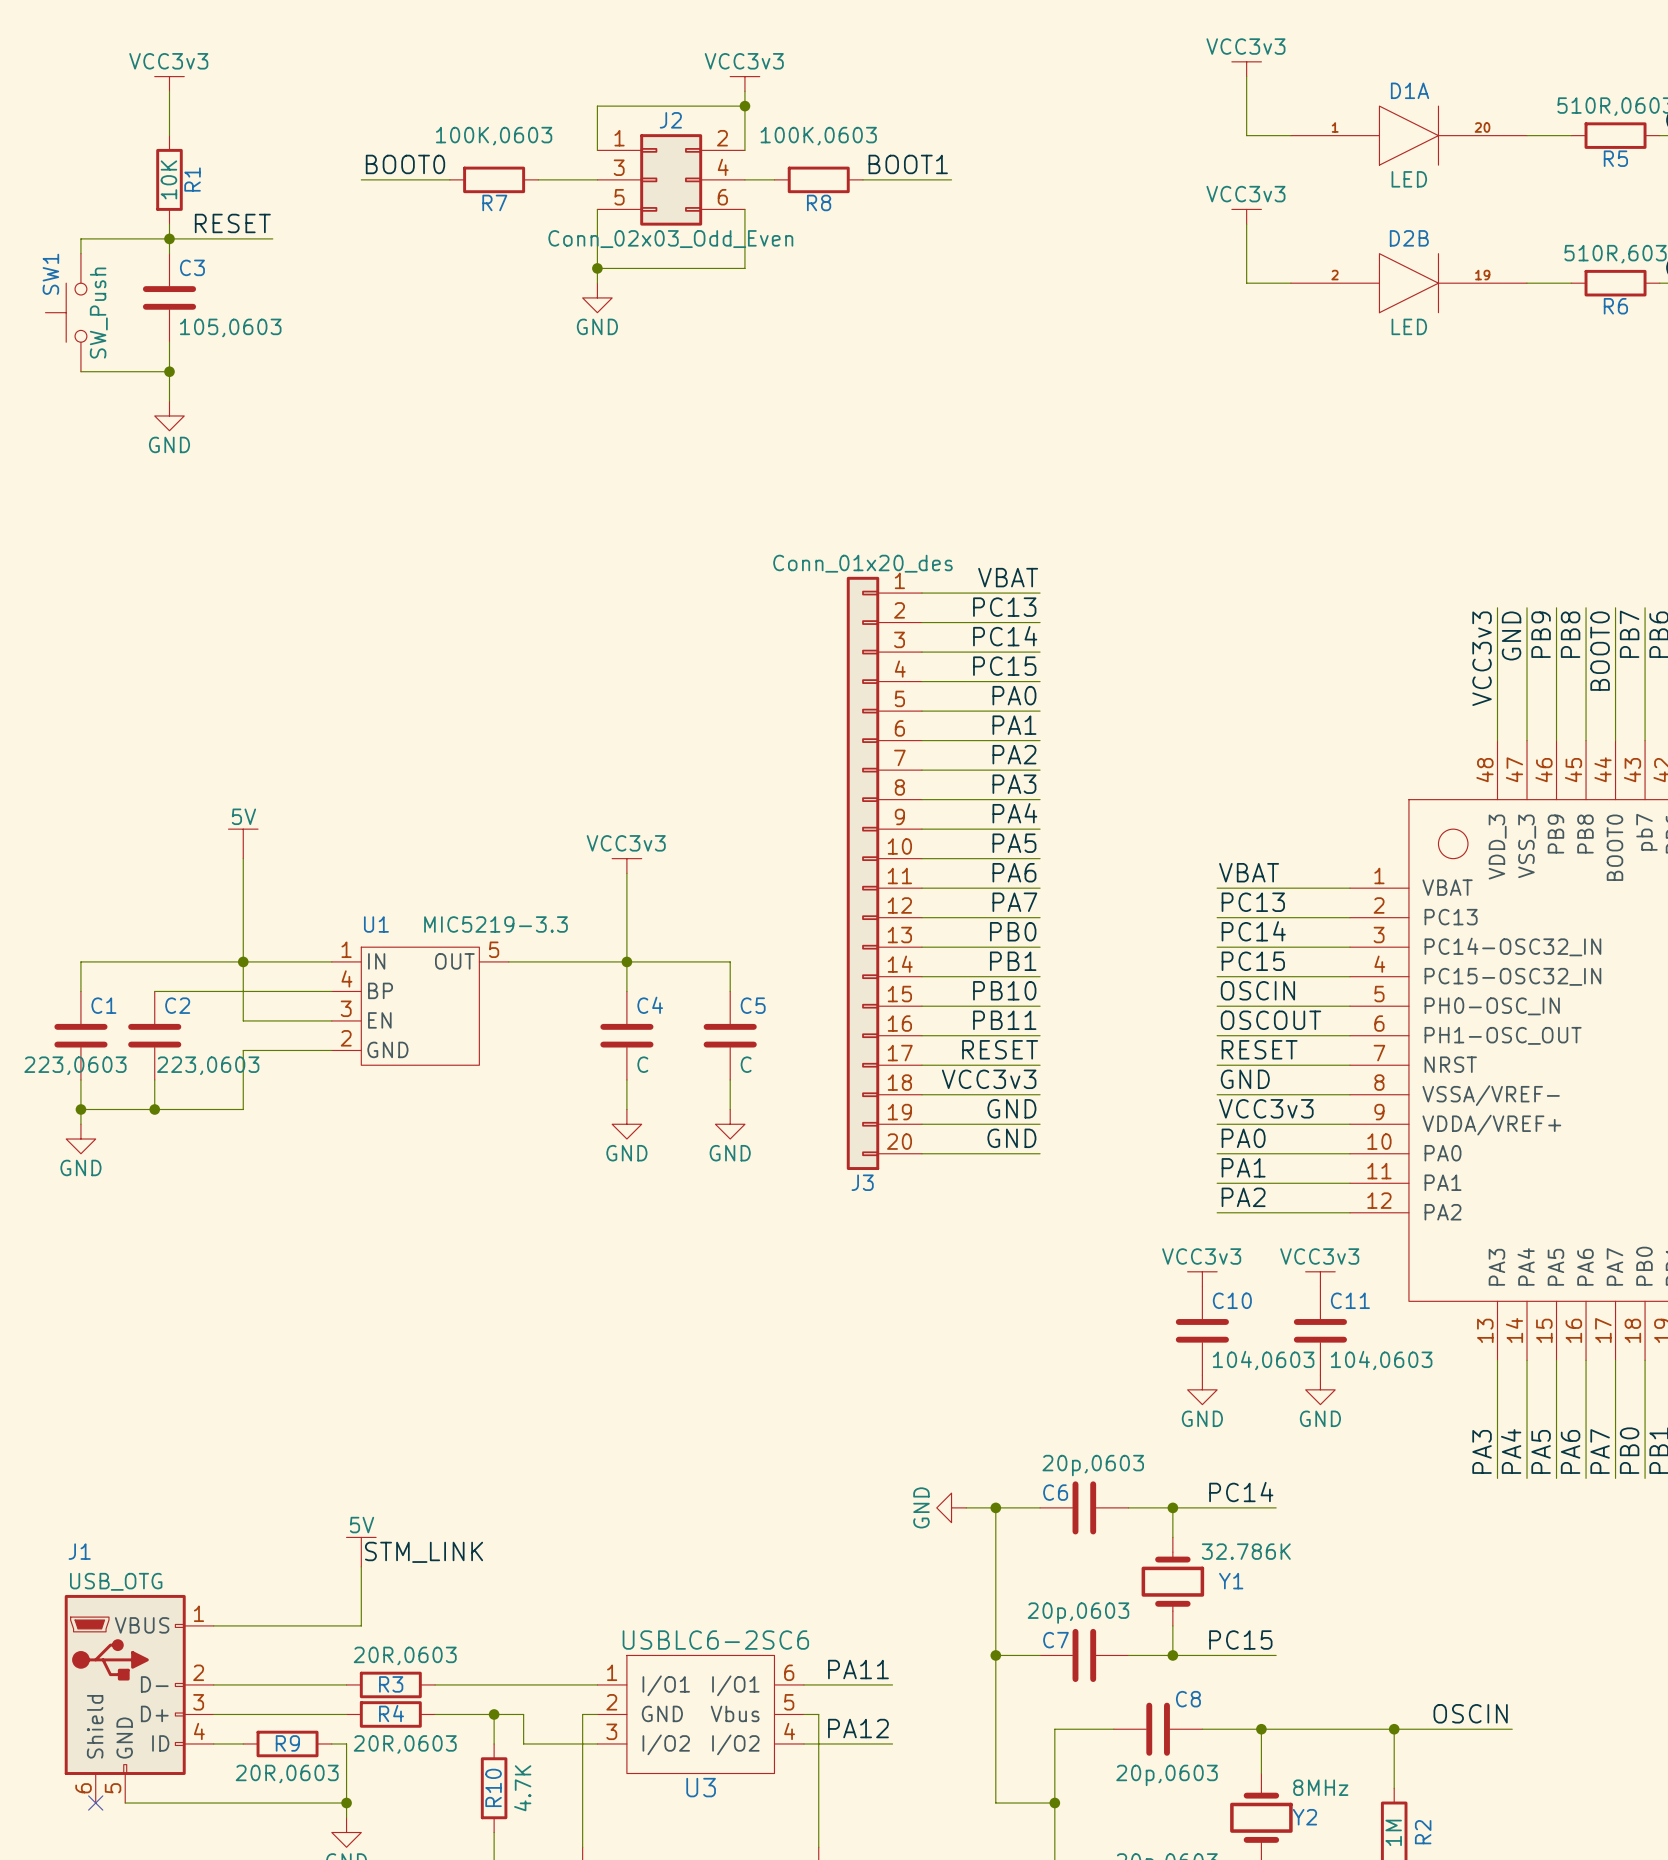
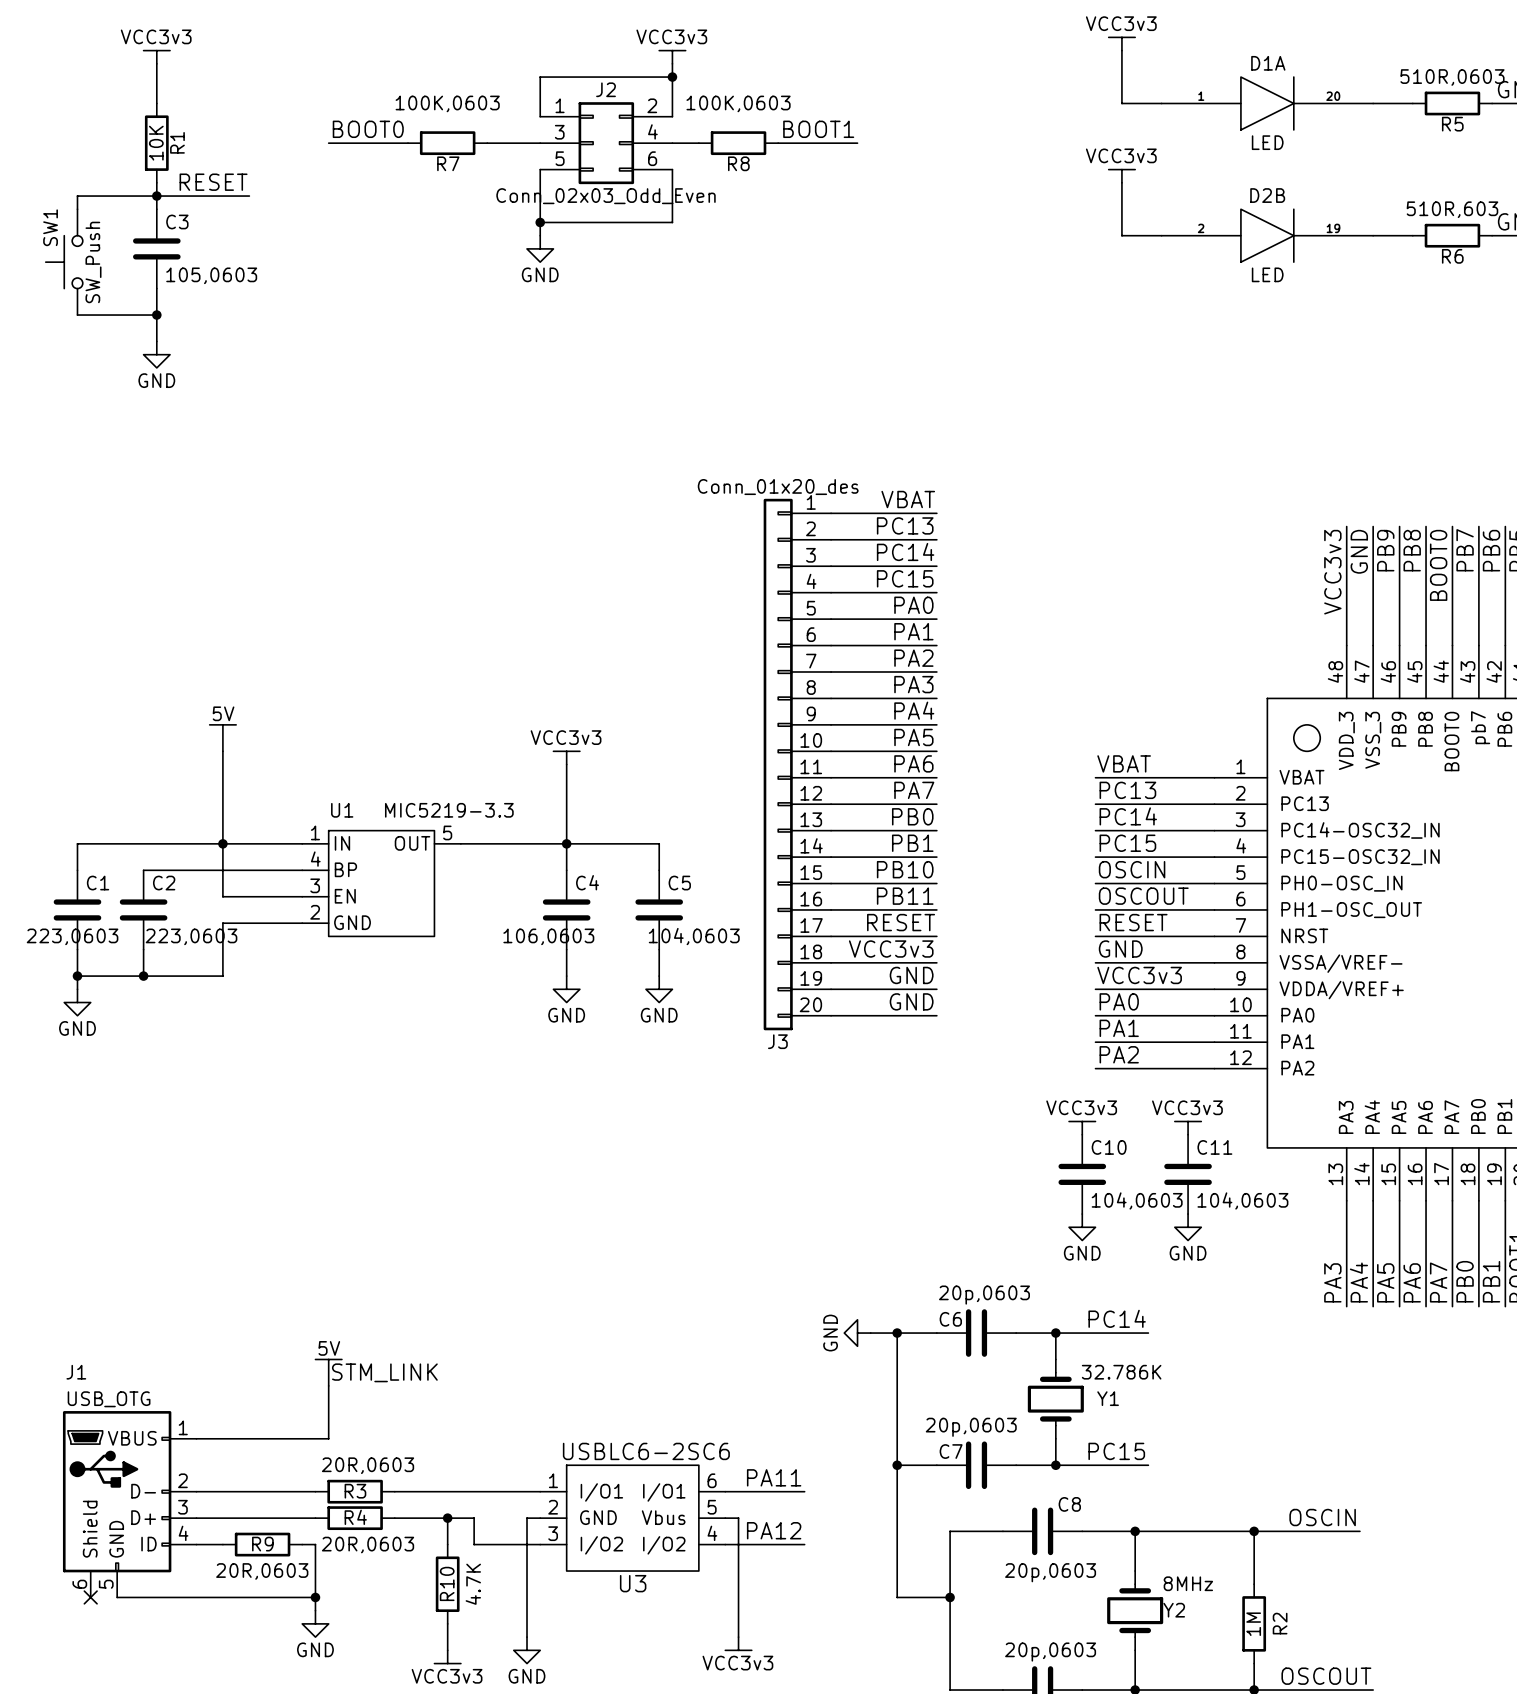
C4 value: C (642, 1064) -> 106,0603 (548, 936)
C5 value: C (746, 1064) -> 104,0603 (694, 936)

